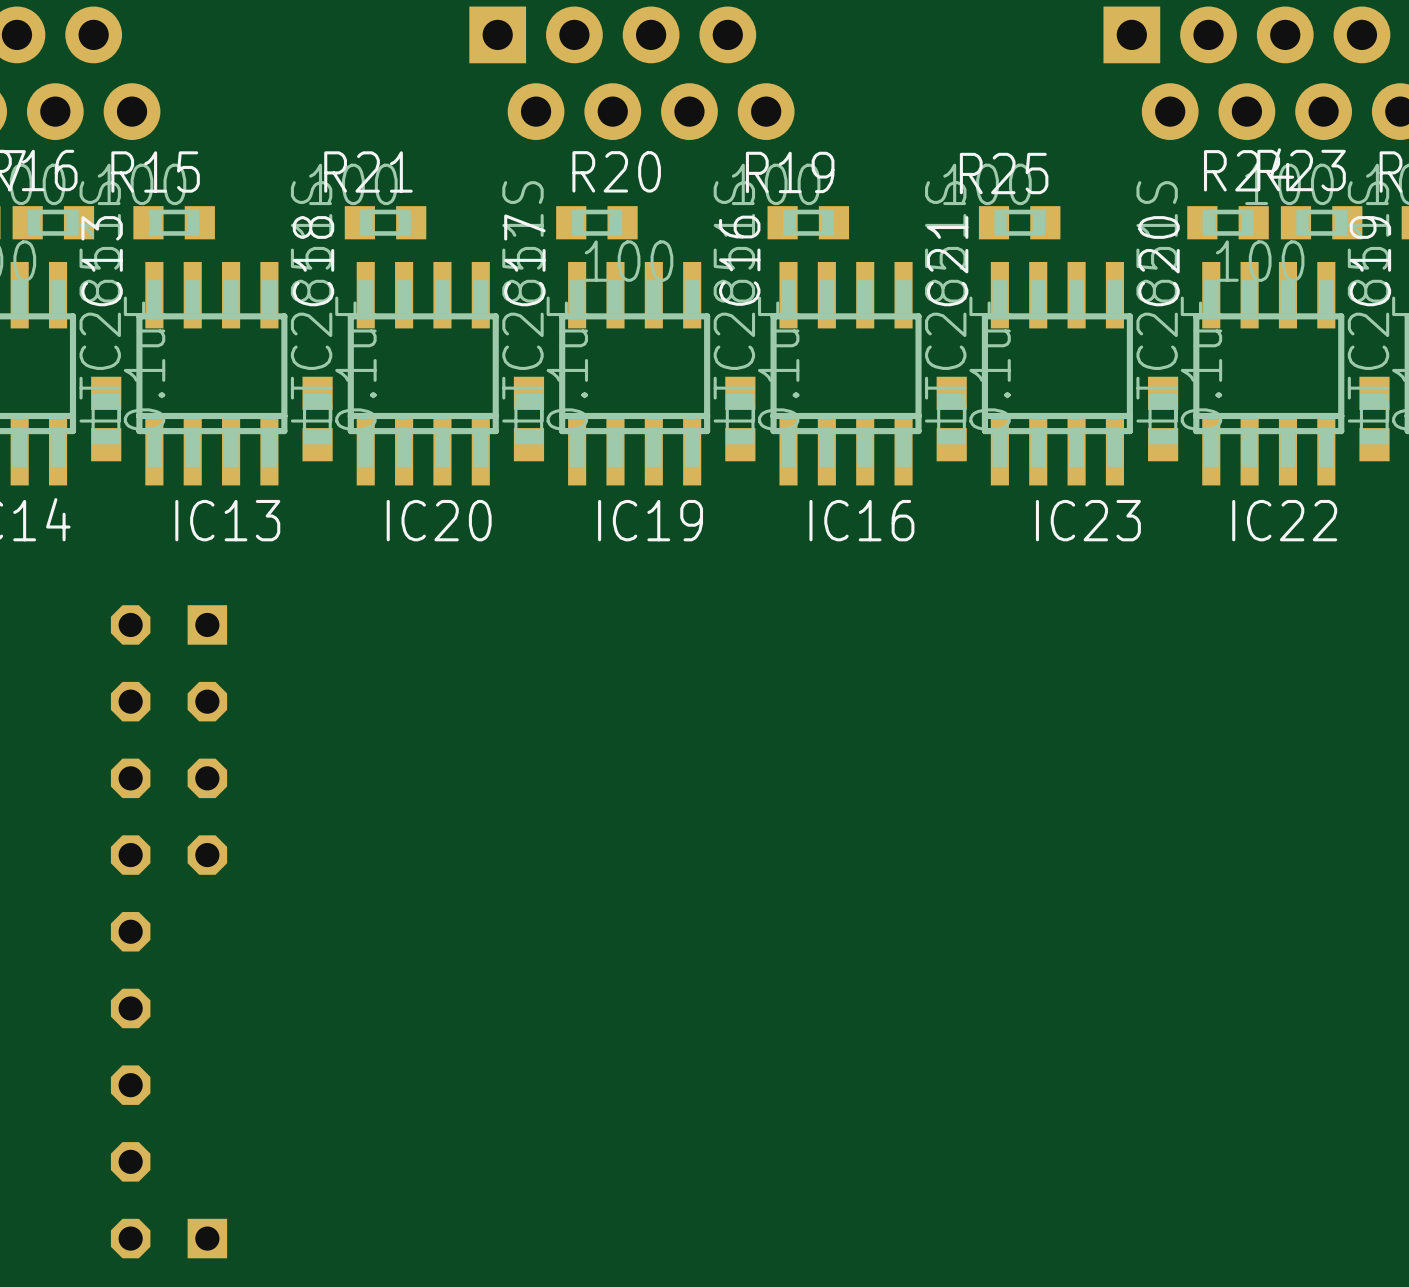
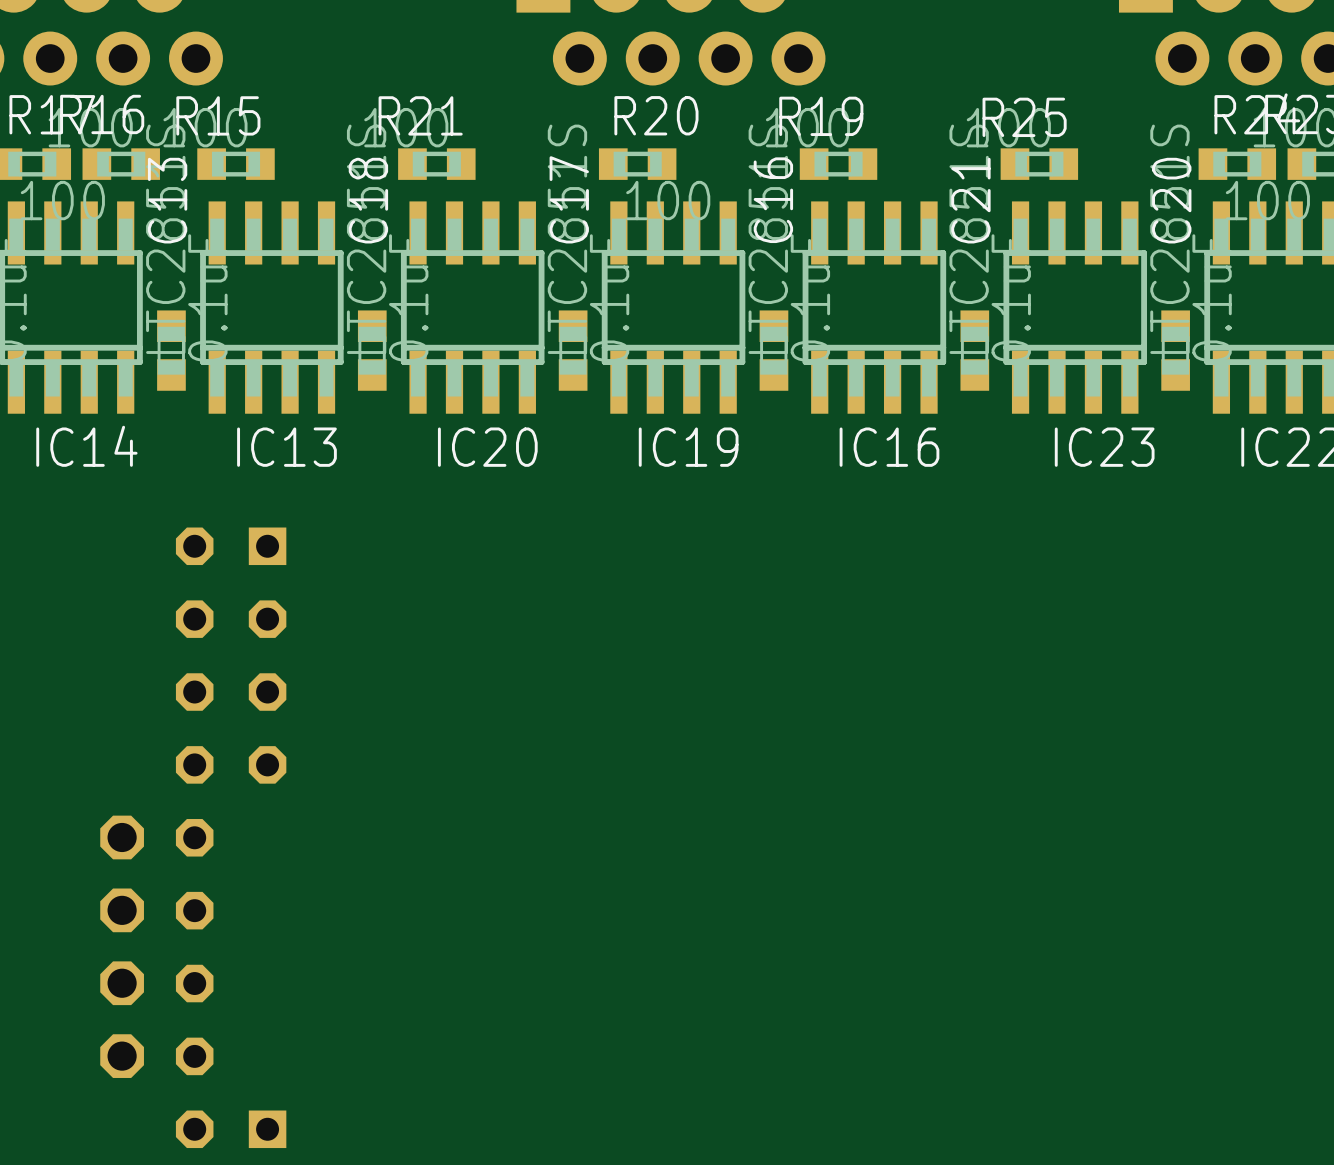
part: none -> (122, 946)

